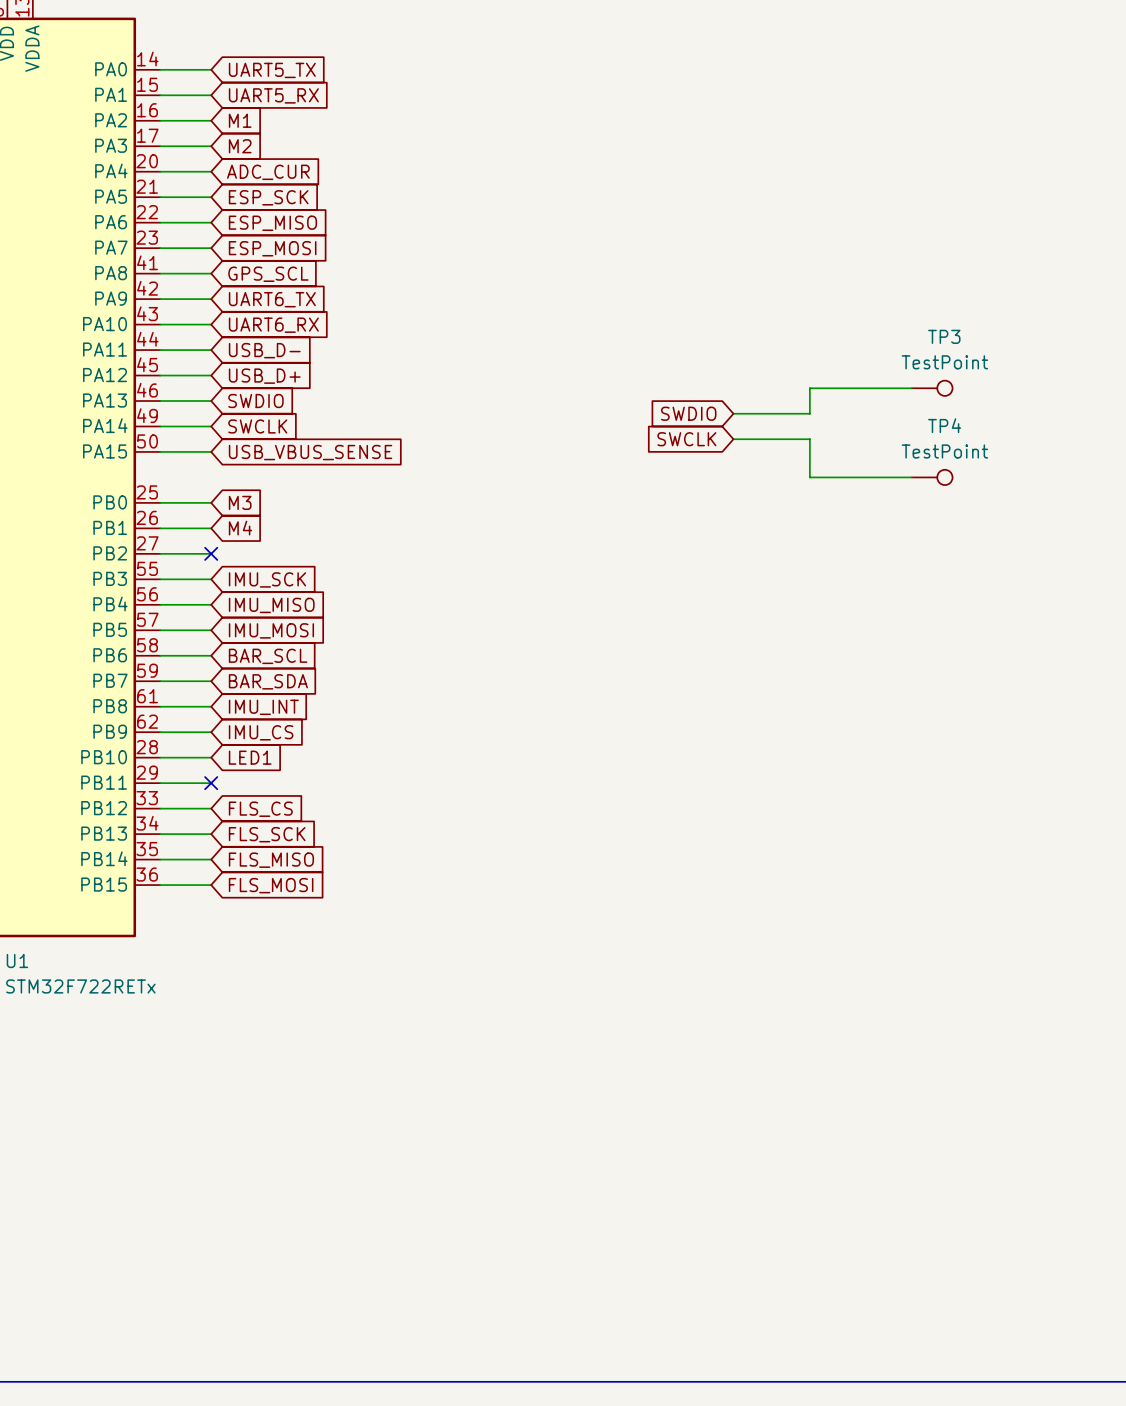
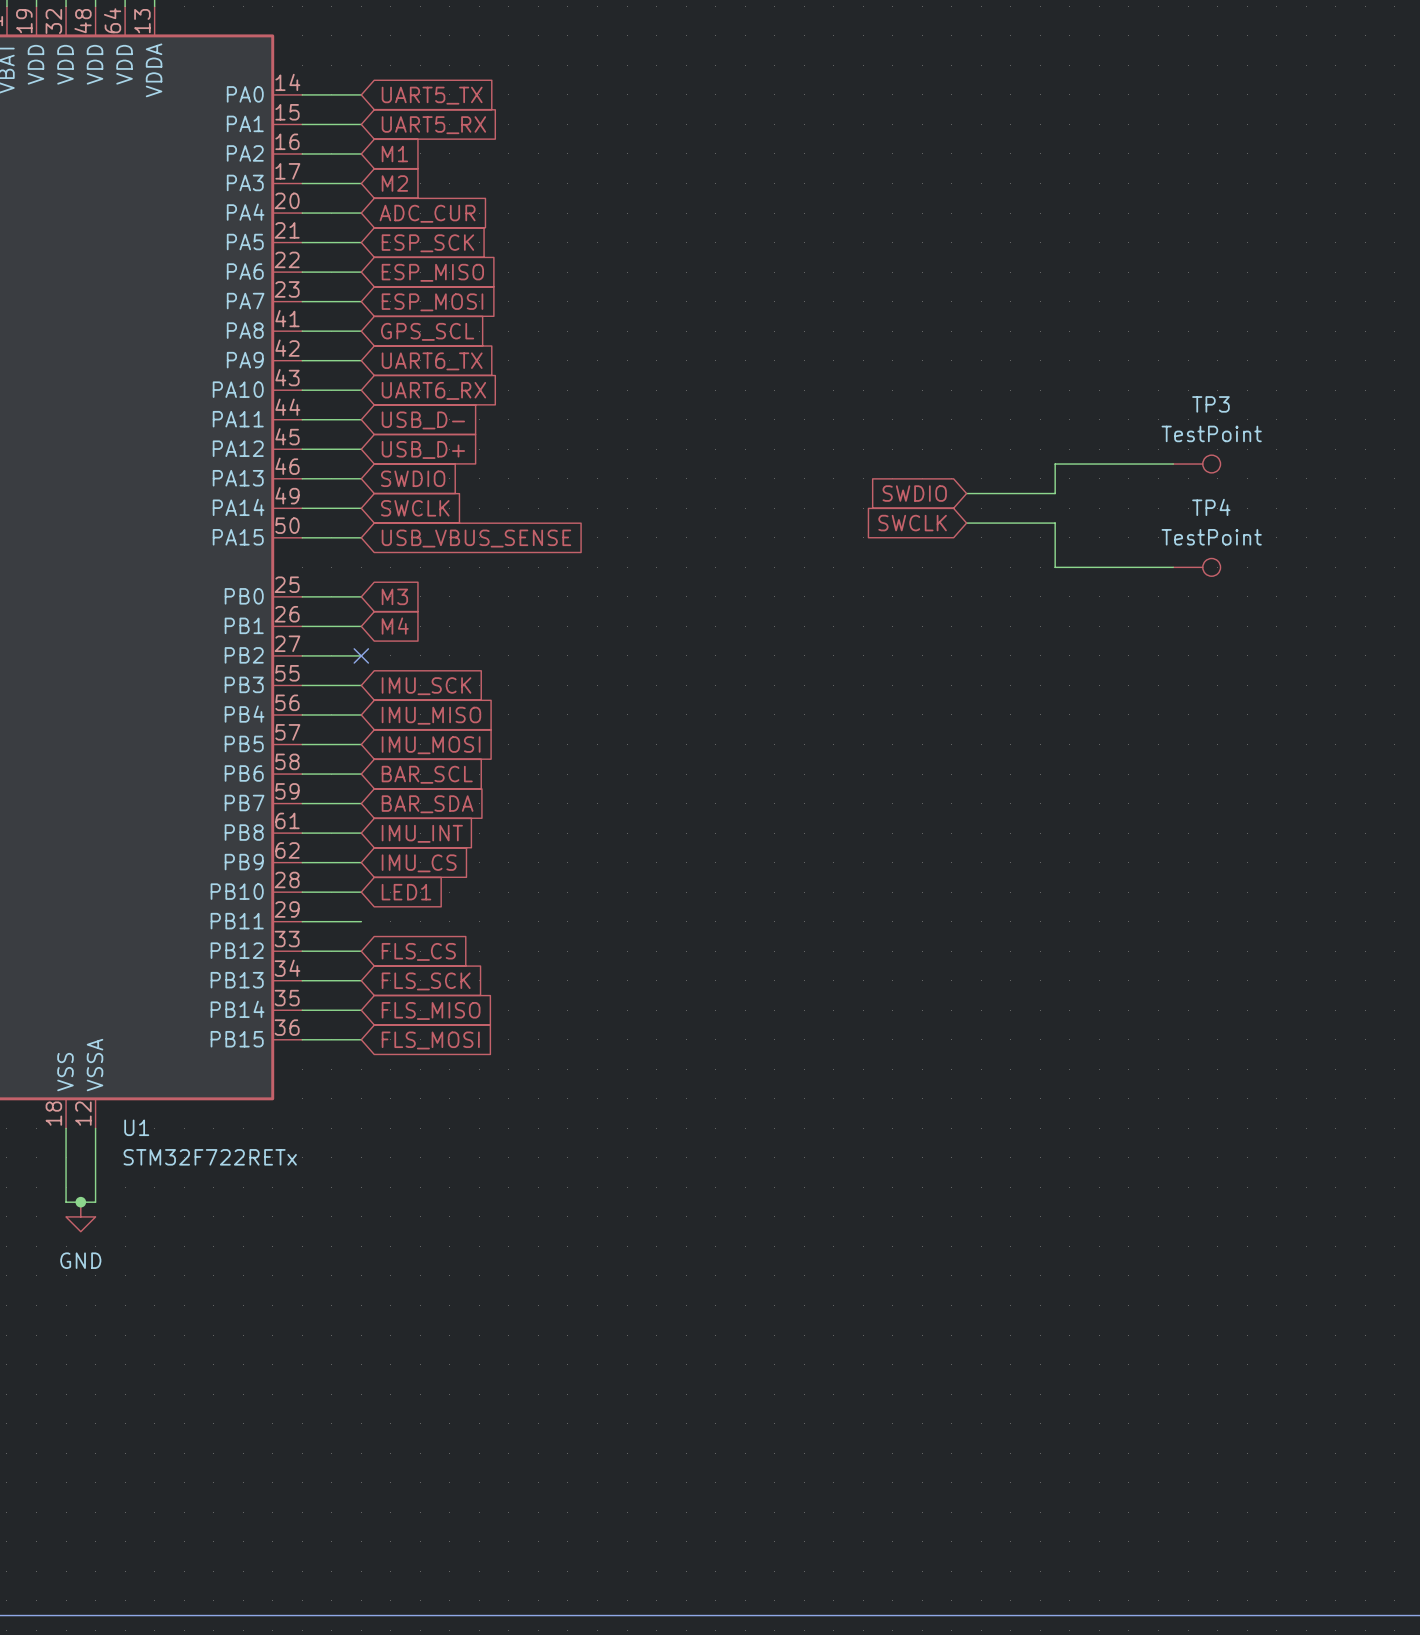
no-connect mark: (211, 783) -> none

